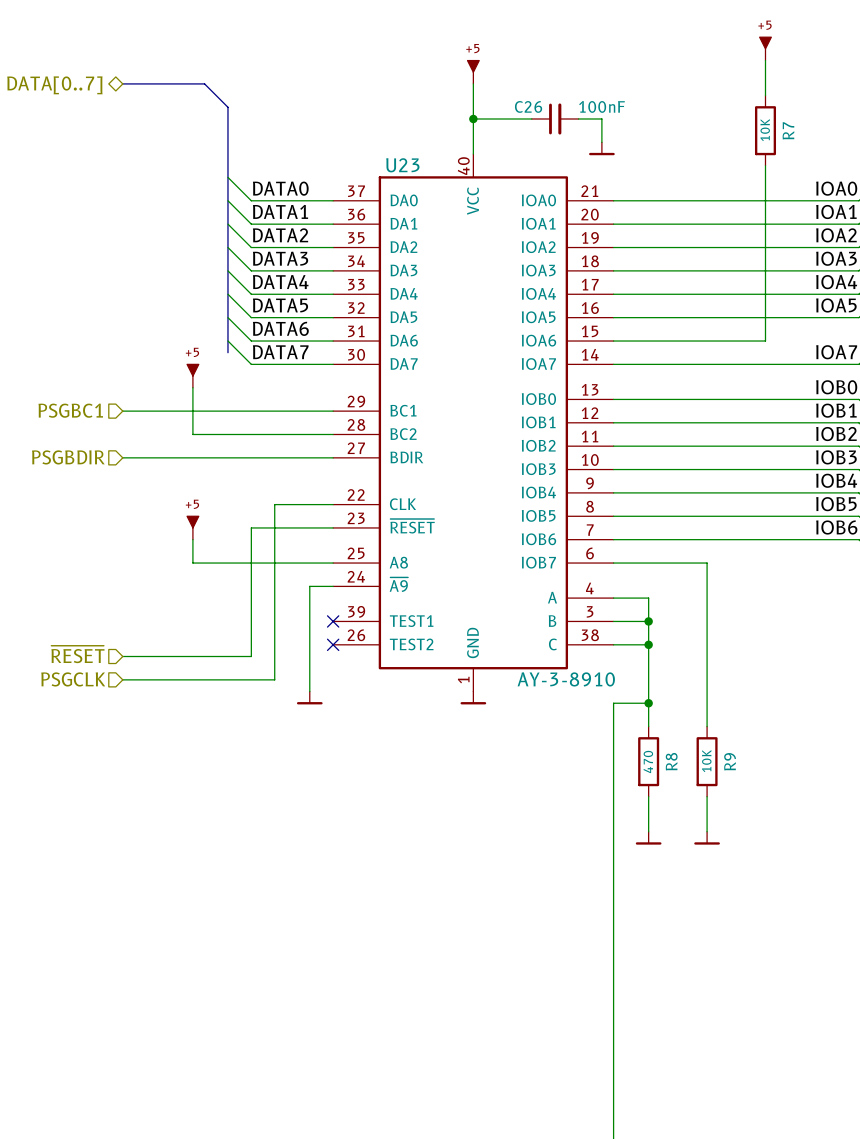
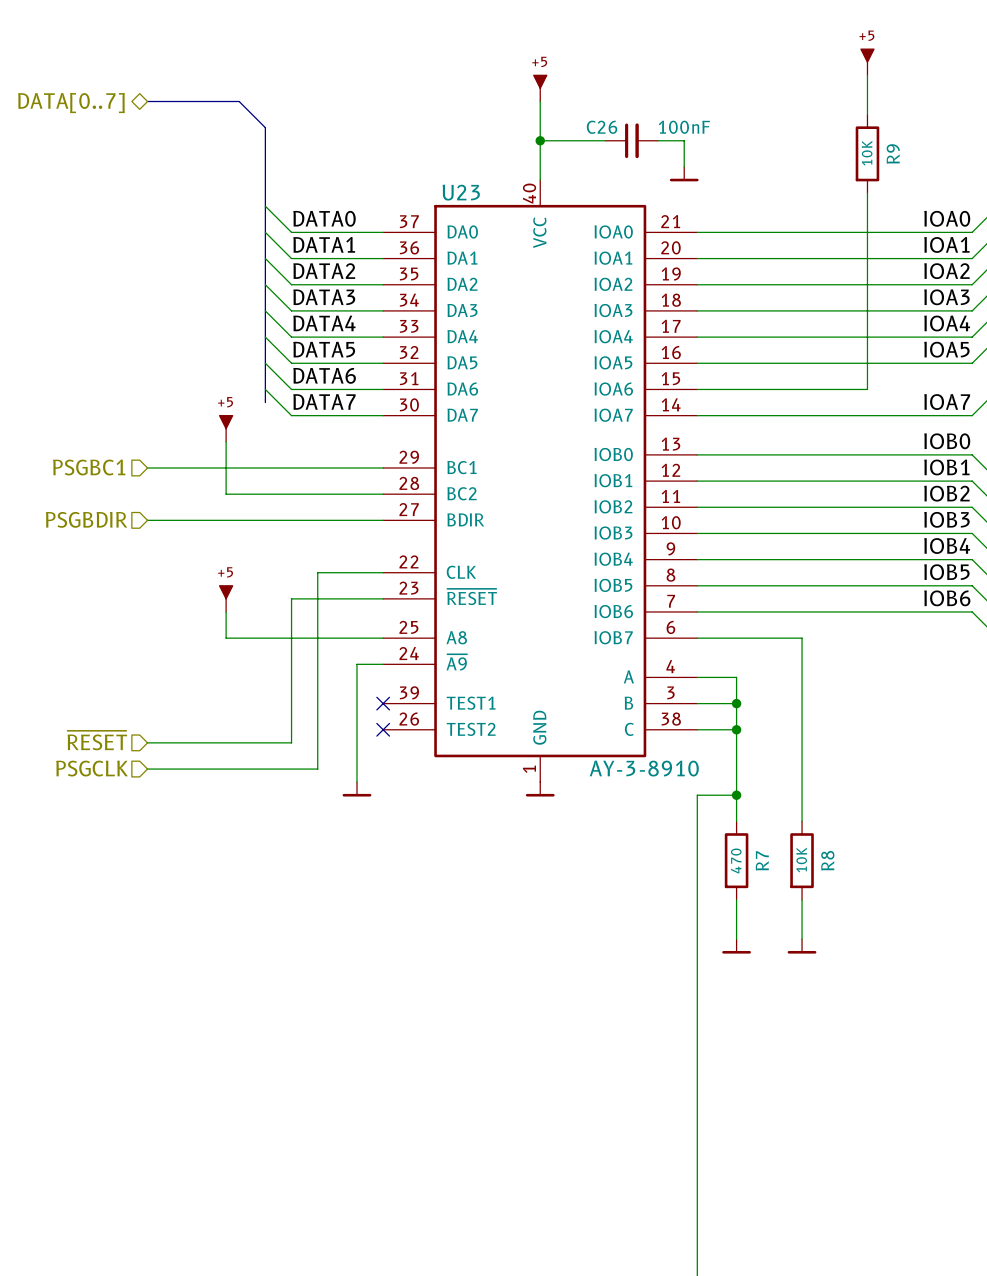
R7 name: R7 (788, 130) -> R9 (893, 153)
R8 name: R8 (671, 761) -> R7 (762, 860)
R9 name: R9 (730, 761) -> R8 (827, 860)

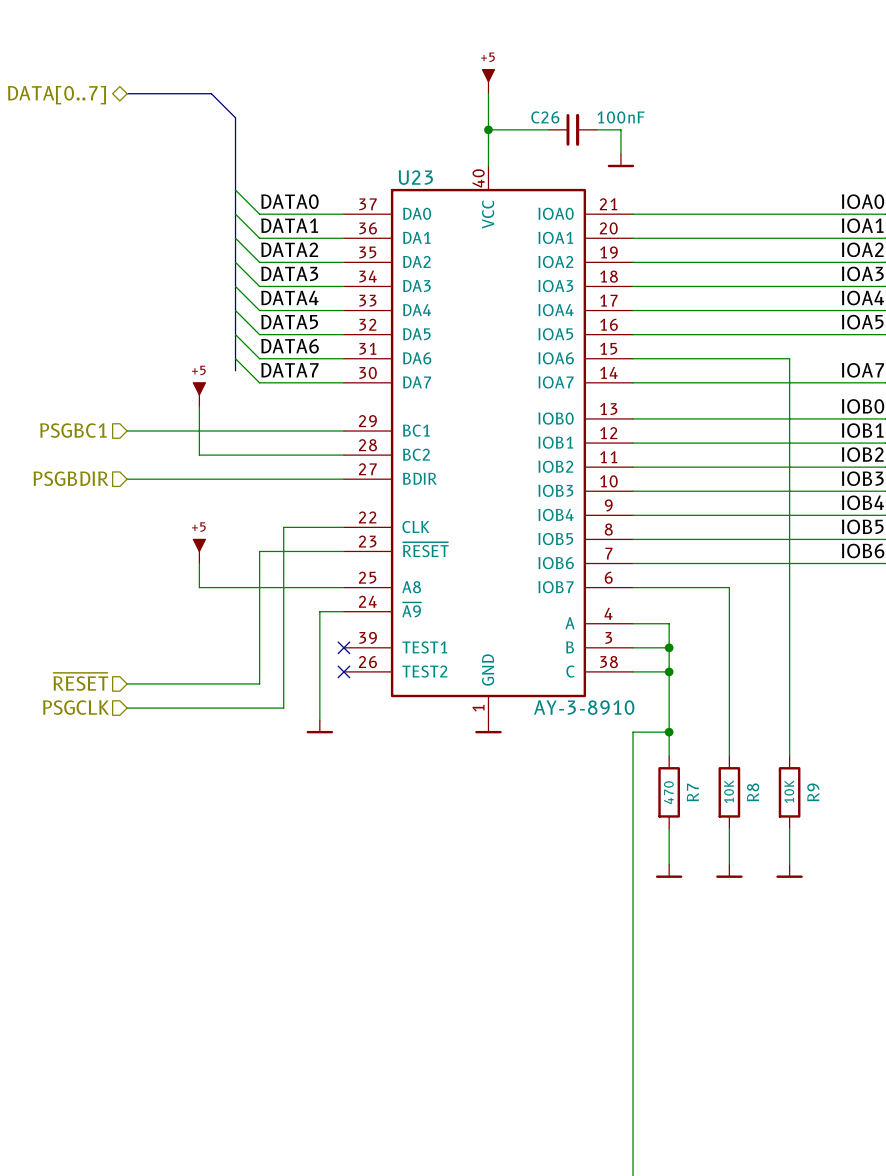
power symbol: (867, 62) -> none
wire: (867, 75) (867, 114) -> none
R9 position: (867, 153) -> (789, 792)
wire: (867, 193) (867, 389) -> (789, 756) (789, 358)
wire: none -> (789, 828) (789, 864)
power symbol: none -> (789, 871)

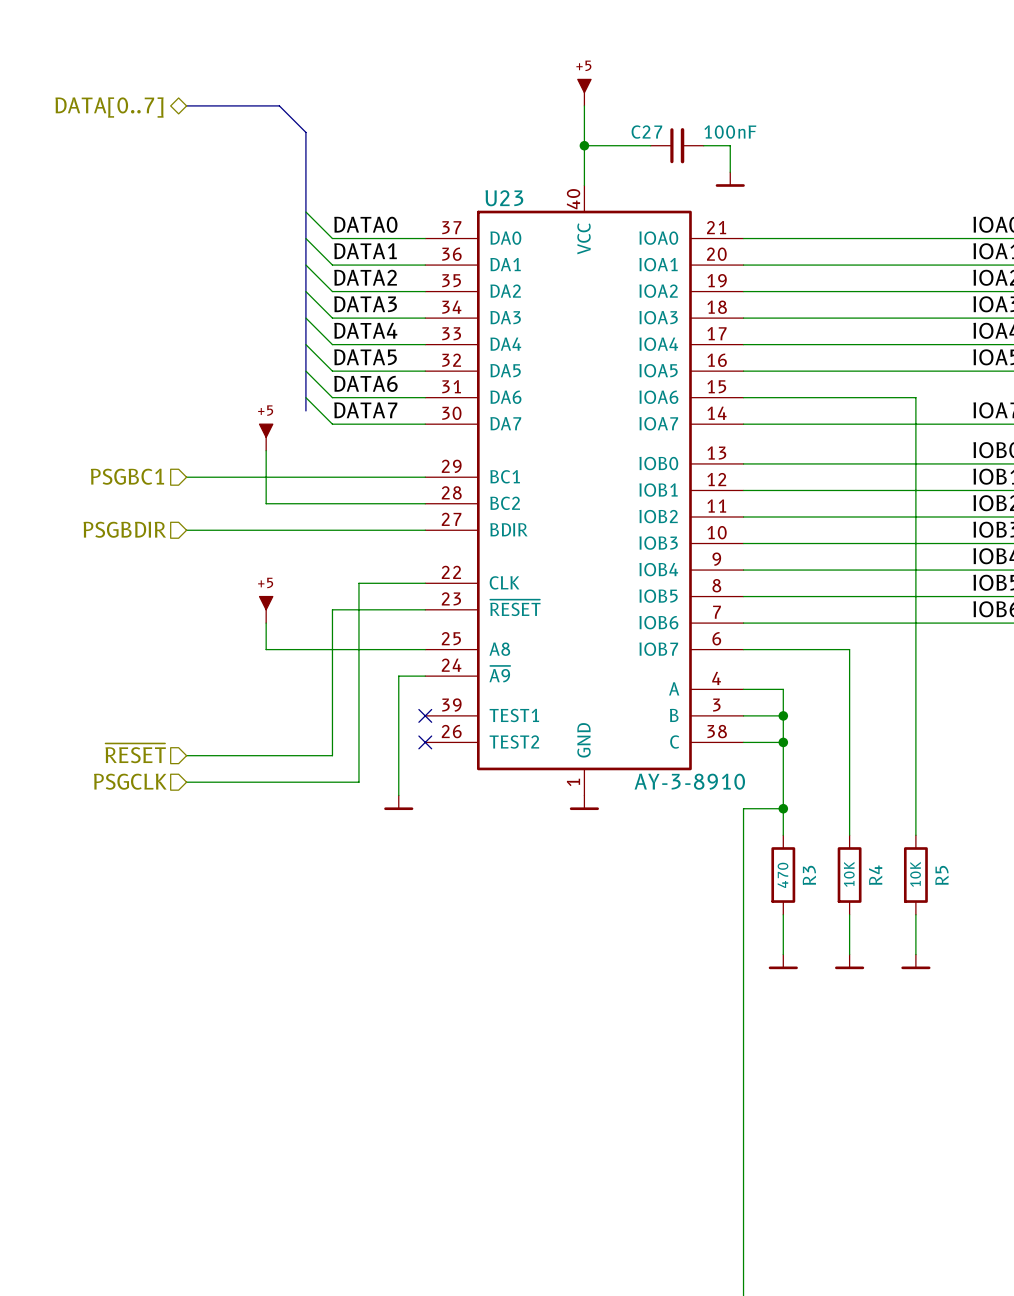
C26 name: C26 (545, 117) -> C27 (646, 132)
R7 name: R7 (692, 792) -> R3 (809, 875)
R8 name: R8 (753, 792) -> R4 (875, 875)
R9 name: R9 (813, 792) -> R5 (941, 875)

